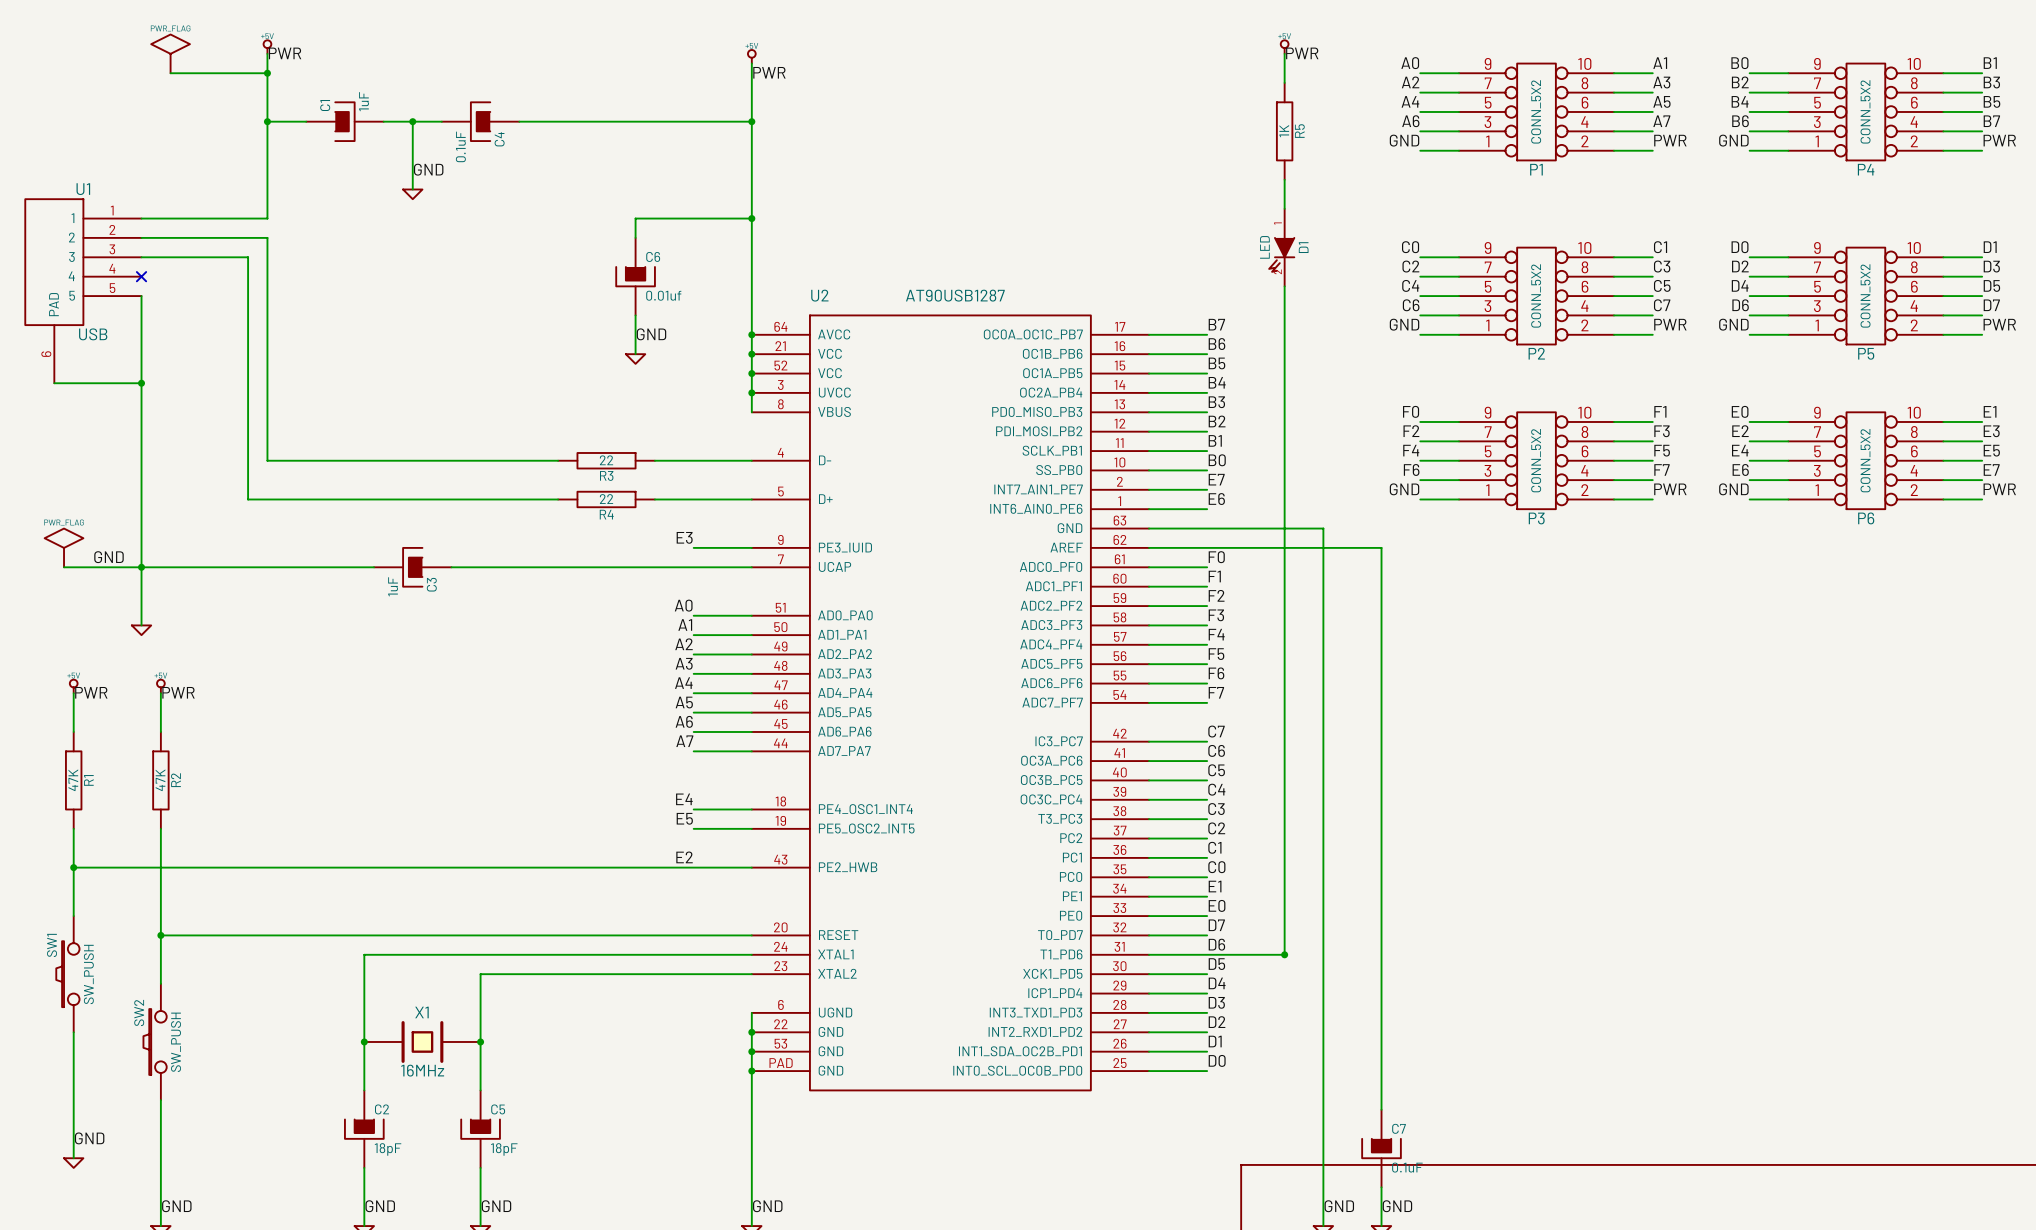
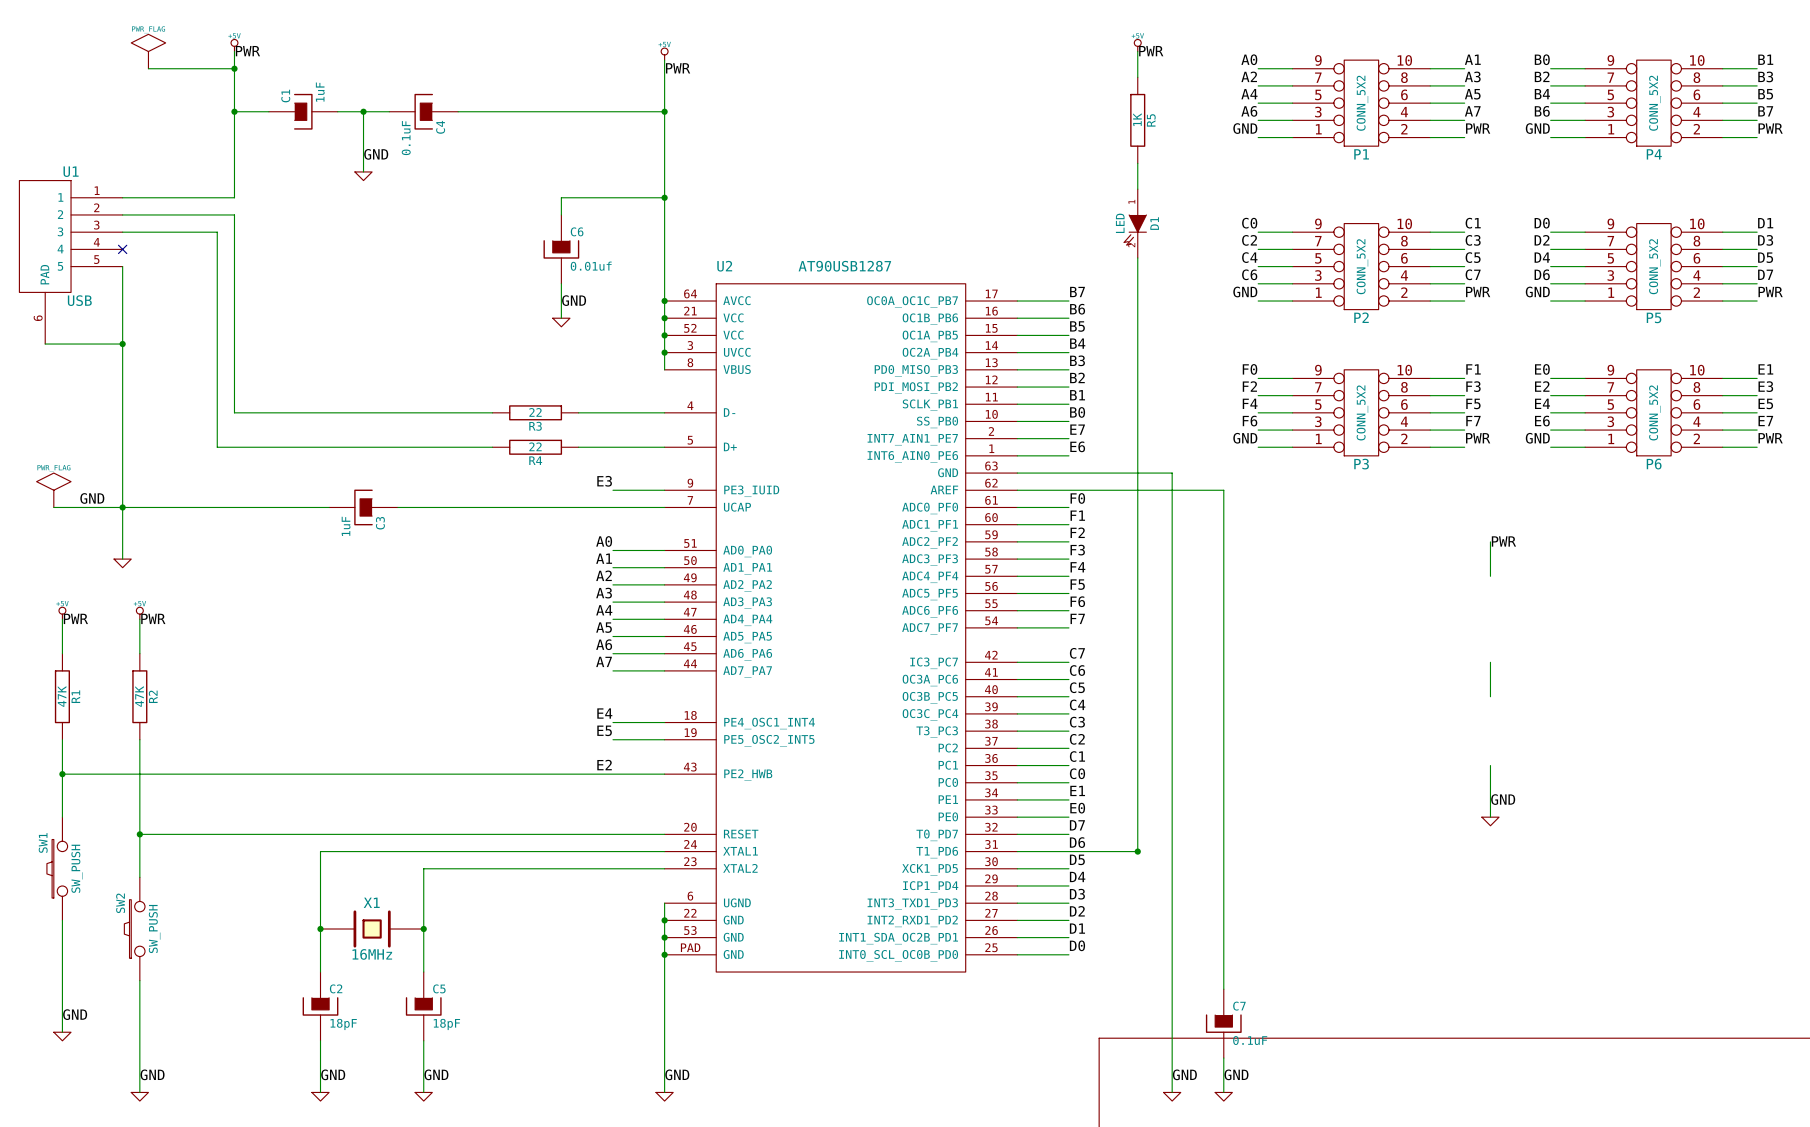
label: none -> PWR (1503, 541)
wire: none -> (1490, 541) (1490, 576)
wire: none -> (1490, 662) (1490, 696)
wire: none -> (1490, 765) (1490, 817)
label: none -> GND (1503, 799)
power symbol: none -> (1490, 821)

